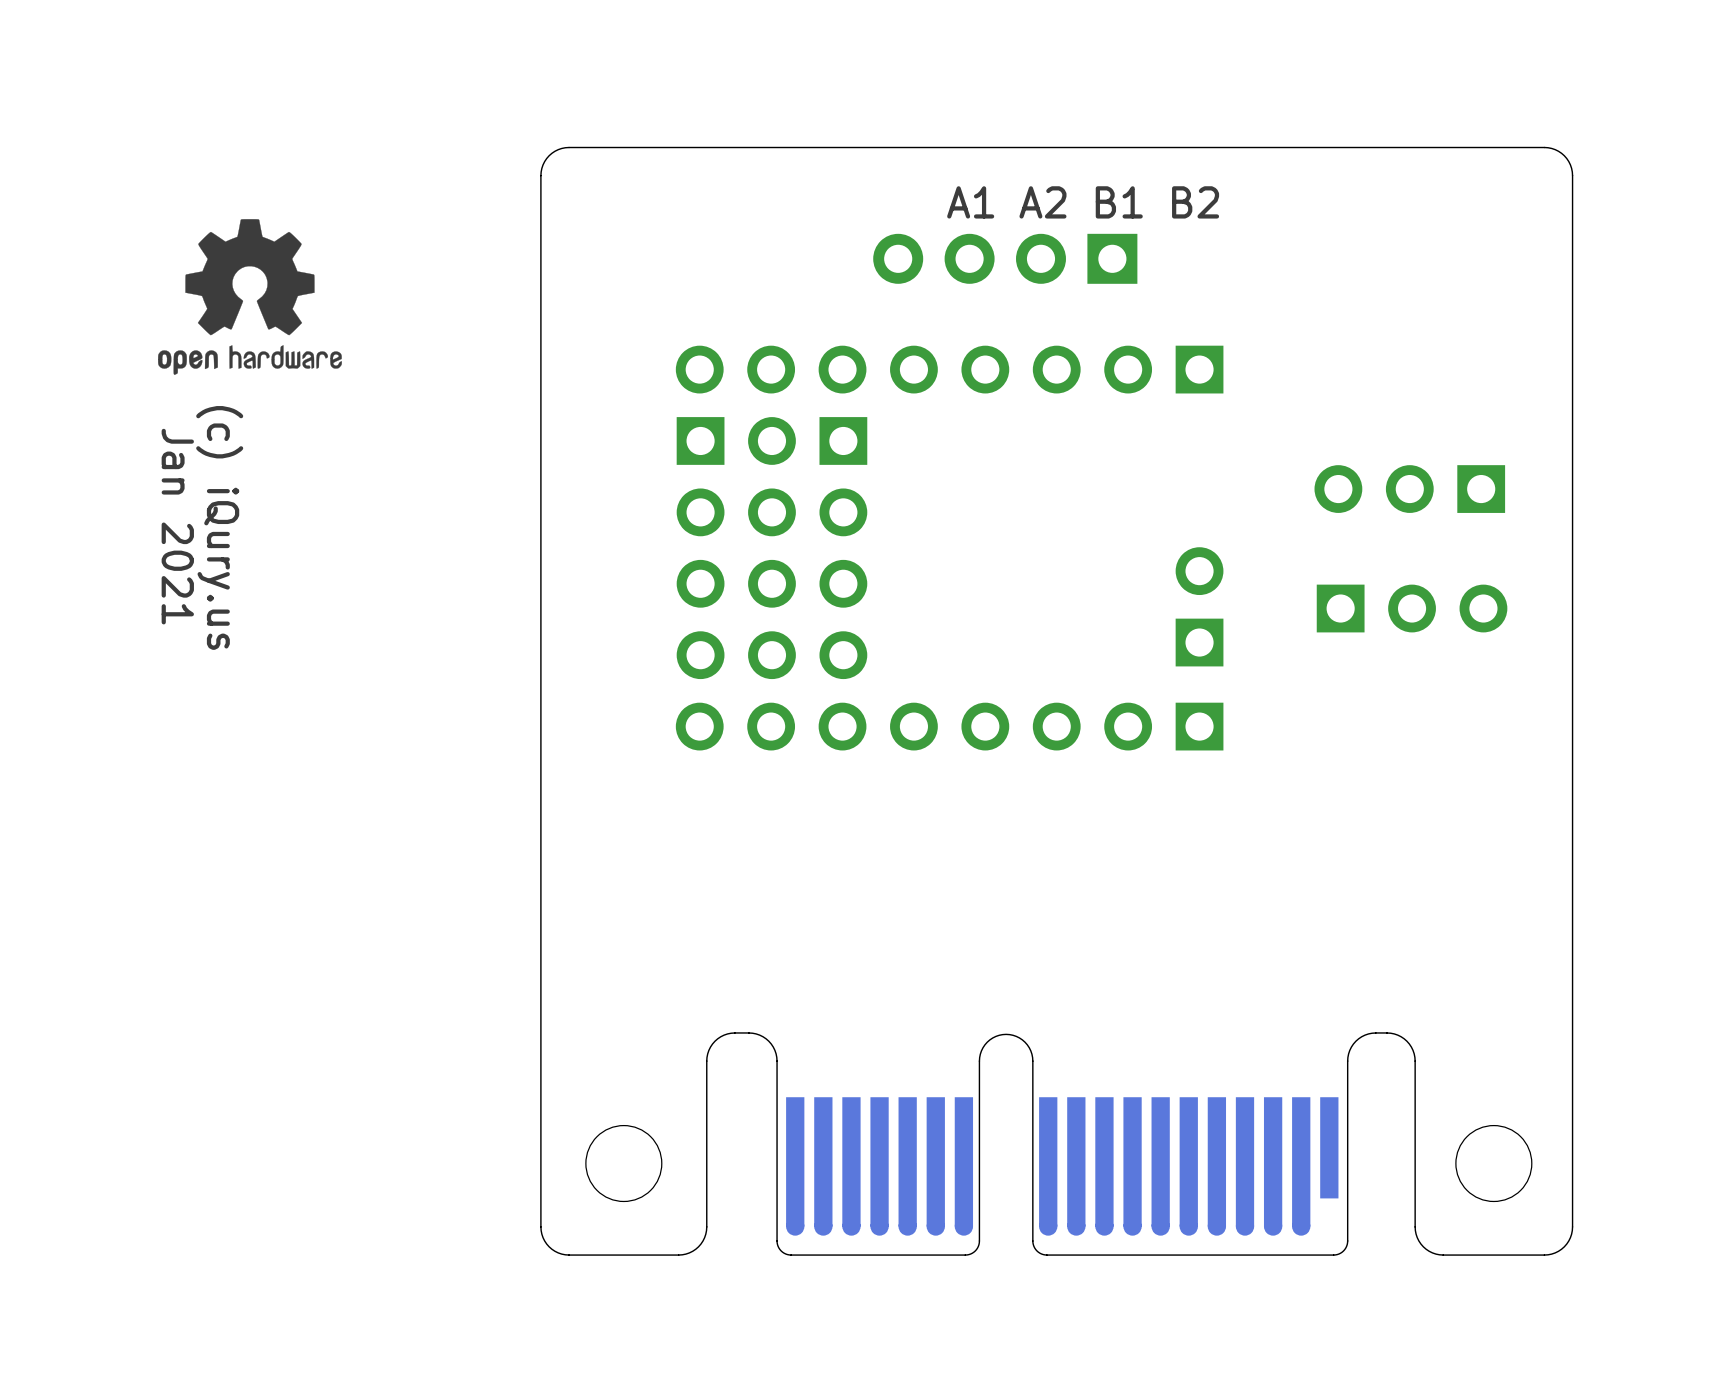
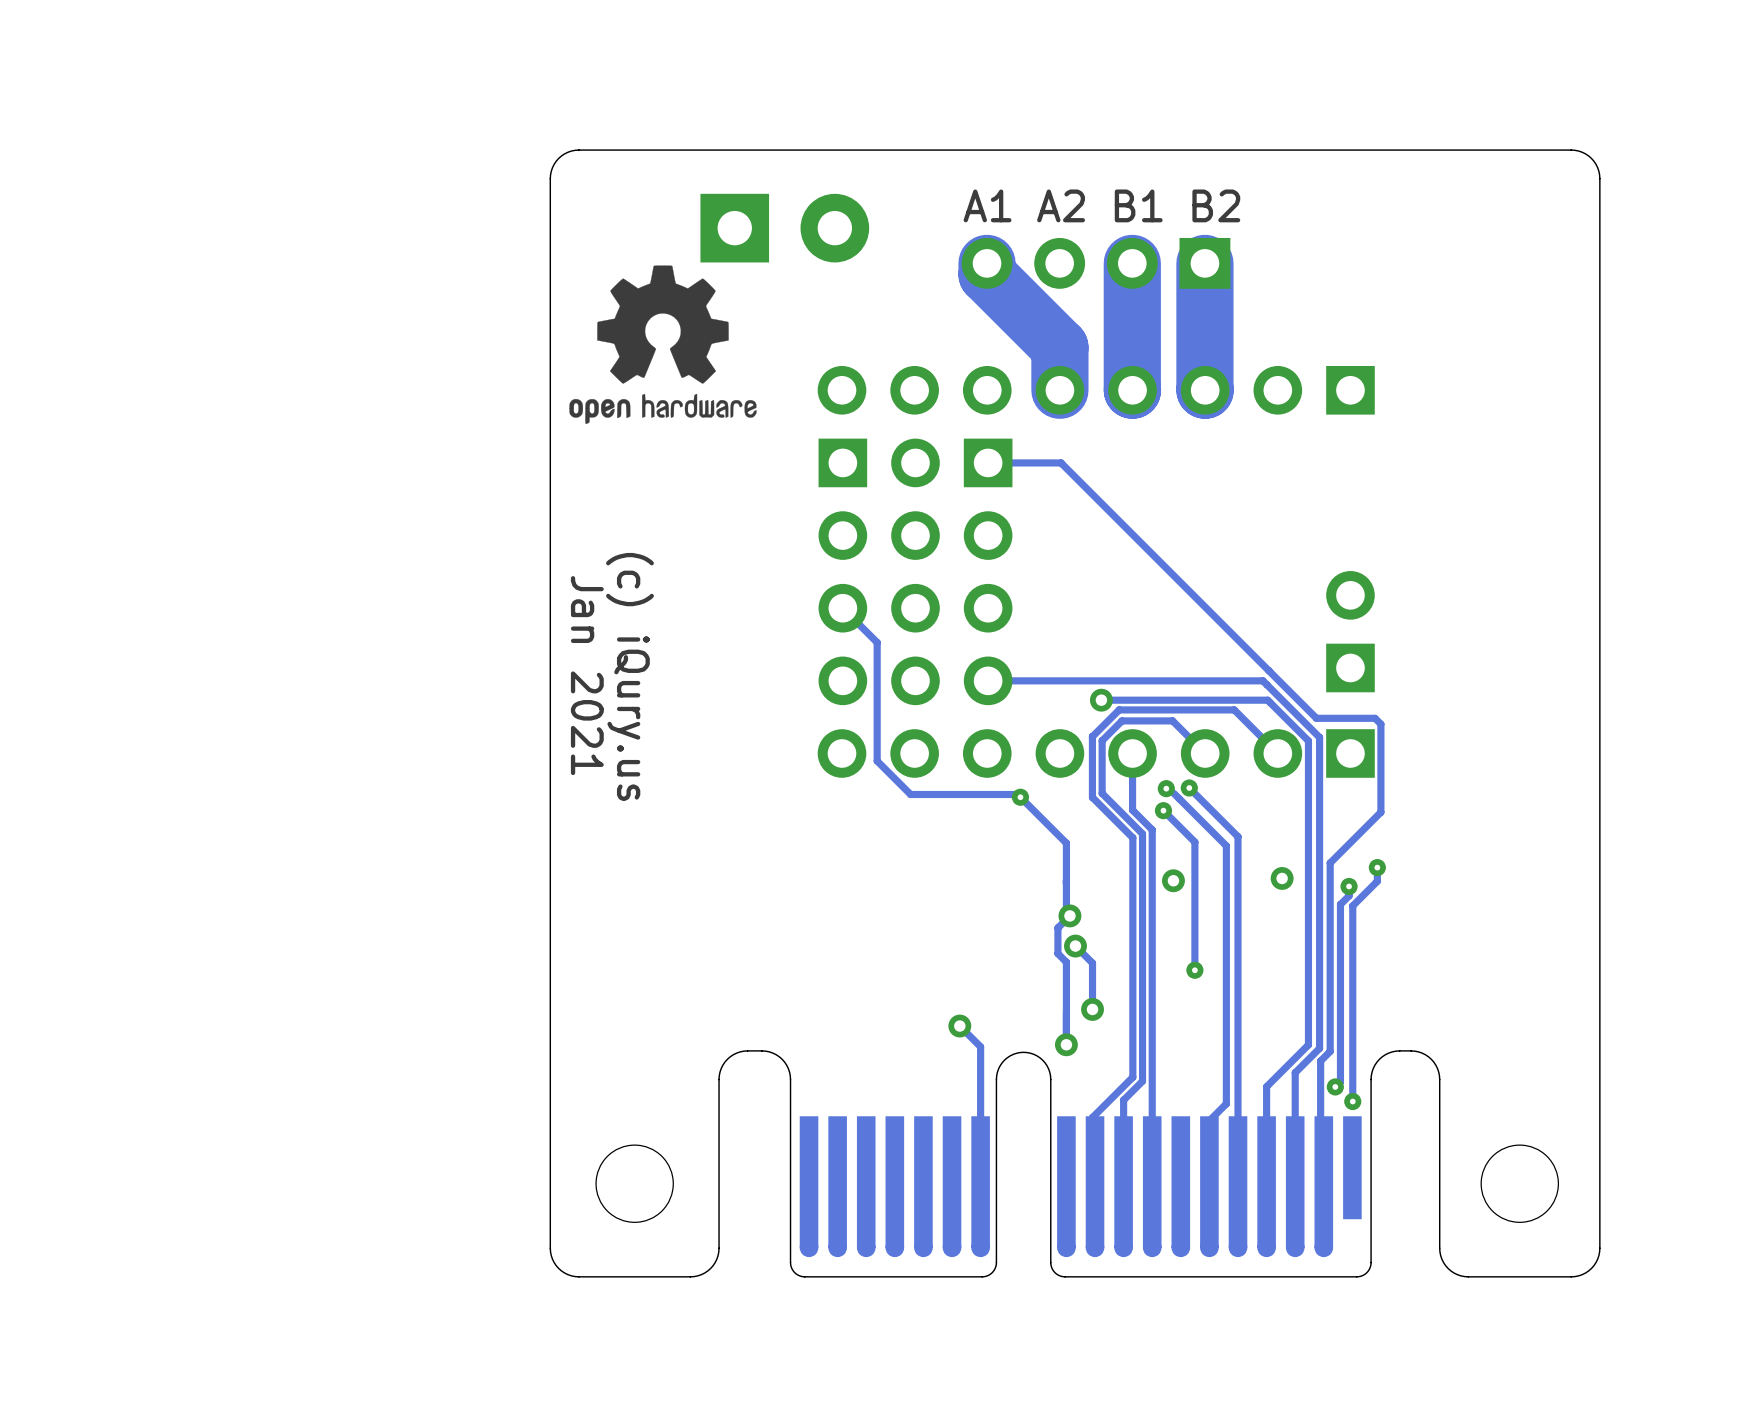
part: none -> (784, 228)
track: none -> (987, 263) (987, 274) (1059, 347) (1059, 390)
part position: (1005, 258) -> (1095, 263)
track: none -> (1132, 263) (1132, 390)
track: none -> (1204, 263) (1204, 390)
drawing position: (249, 296) -> (662, 344)
part position: (949, 369) -> (1096, 390)
part footprint: [748, 417, 868, 680] -> [818, 438, 868, 706]
track: none -> (988, 462) (1061, 462) (1316, 718) (1375, 718) (1380, 724) (1380, 812) (1330, 863) (1330, 1051) (1320, 1061) (1320, 1178) (1323, 1182)
part: (1409, 489) -> none
text position: Jan 2021 (177, 526) -> Jan 2021 (587, 675)
text position: (c) iQury.us (219, 527) -> (c) iQury.us (629, 676)
part: (700, 548) -> none
part: none -> (951, 571)
track: none -> (842, 608) (877, 642) (877, 761) (910, 794) (1017, 794) (1066, 843) (1066, 912) (1069, 915) (1057, 927) (1057, 953) (1066, 962) (1066, 1044)
part position: (1199, 606) -> (1350, 631)
part: (1412, 608) -> none
track: none -> (988, 680) (1262, 680) (1319, 737) (1319, 1048) (1295, 1072) (1295, 1182)
track: none -> (1101, 700) (1267, 700) (1308, 740) (1308, 1044) (1266, 1086) (1266, 1182)
via: none -> (1101, 700)
part position: (949, 726) -> (1096, 753)
track: none -> (1132, 753) (1132, 810) (1152, 829) (1152, 1182)
track: none -> (1205, 753) (1172, 720) (1121, 720) (1102, 740) (1102, 793) (1142, 833) (1142, 1081) (1123, 1100) (1123, 1182)
track: none -> (1277, 753) (1234, 709) (1119, 709) (1092, 736) (1092, 797) (1132, 837) (1132, 1077) (1092, 1117) (1092, 1179) (1095, 1182)
track: none -> (1189, 788) (1238, 836) (1238, 1182)
via: none -> (1189, 788)
via: none -> (1166, 788)
track: none -> (1174, 793) (1226, 845) (1226, 1103) (1209, 1120) (1209, 1182)
via: none -> (1020, 797)
track: none -> (1163, 810) (1194, 842) (1194, 970)
via: none -> (1163, 810)
track: none -> (1377, 867) (1377, 881) (1352, 905) (1352, 1101)
via: none -> (1377, 867)
via: none -> (1282, 878)
via: none -> (1173, 880)
track: none -> (1349, 886) (1349, 895) (1340, 904) (1340, 1081) (1335, 1086)
via: none -> (1349, 886)
via: none -> (1069, 915)
track: none -> (1075, 946) (1092, 963) (1092, 1009)
via: none -> (1075, 946)
via: none -> (1194, 970)
via: none -> (1092, 1009)
track: none -> (959, 1026) (980, 1046) (980, 1182)
via: none -> (959, 1026)
via: none -> (1066, 1044)
via: none -> (1335, 1086)
via: none -> (1352, 1101)

